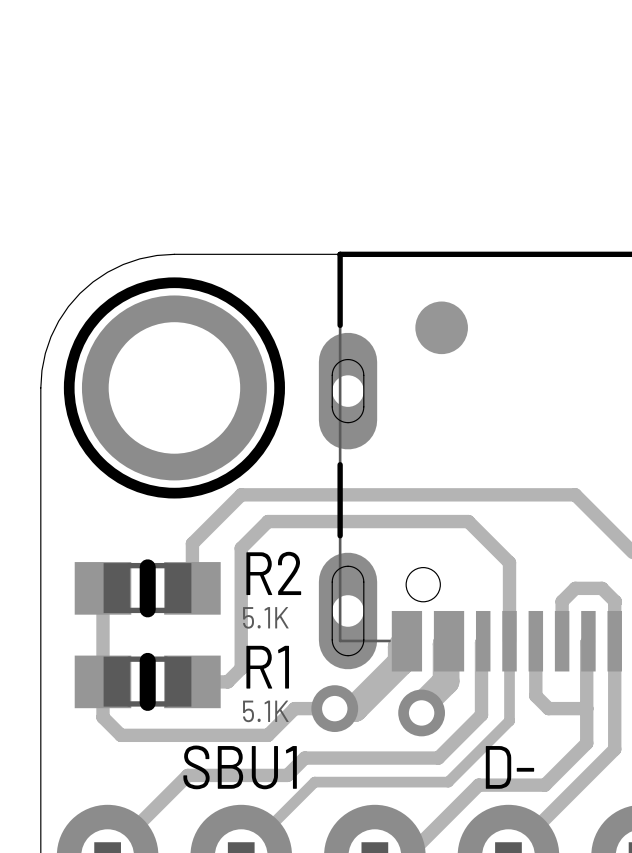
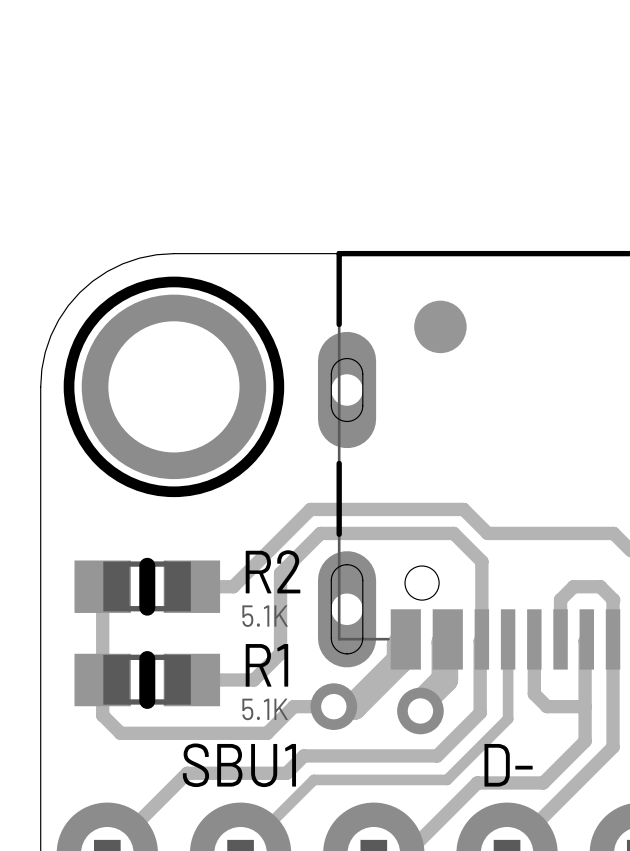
track: (615, 534) (575, 494) (241, 494) (192, 543) (192, 588) -> (613, 533) (487, 533) (463, 509) (310, 509) (233, 586) (191, 586)
track: (509, 641) (509, 562) (468, 521) (267, 521) (241, 548) (241, 668) (227, 681) -> (481, 639) (481, 561) (453, 533) (320, 533) (280, 573) (280, 653) (253, 680) (227, 680)

